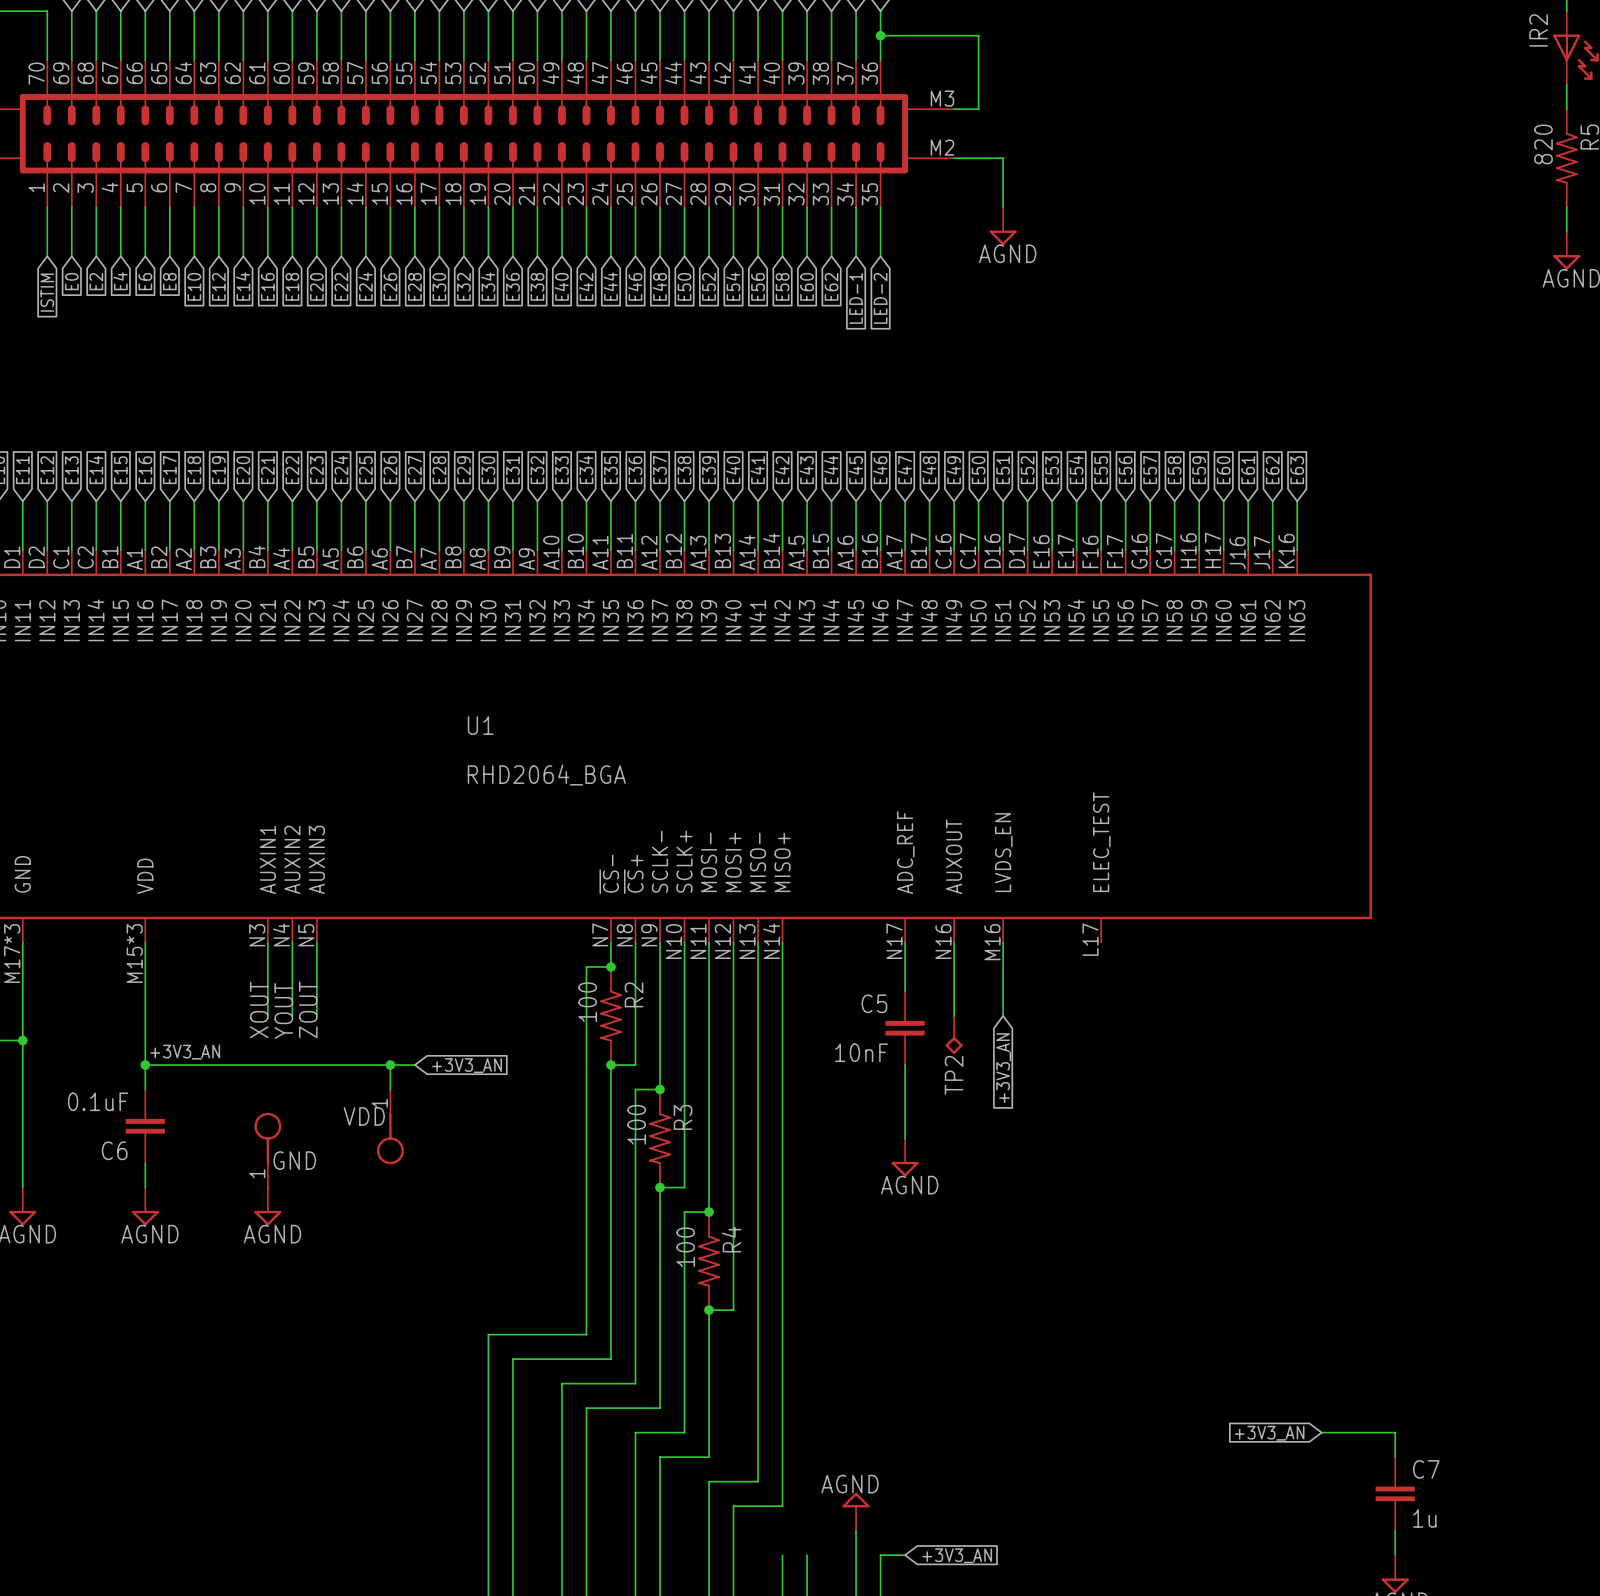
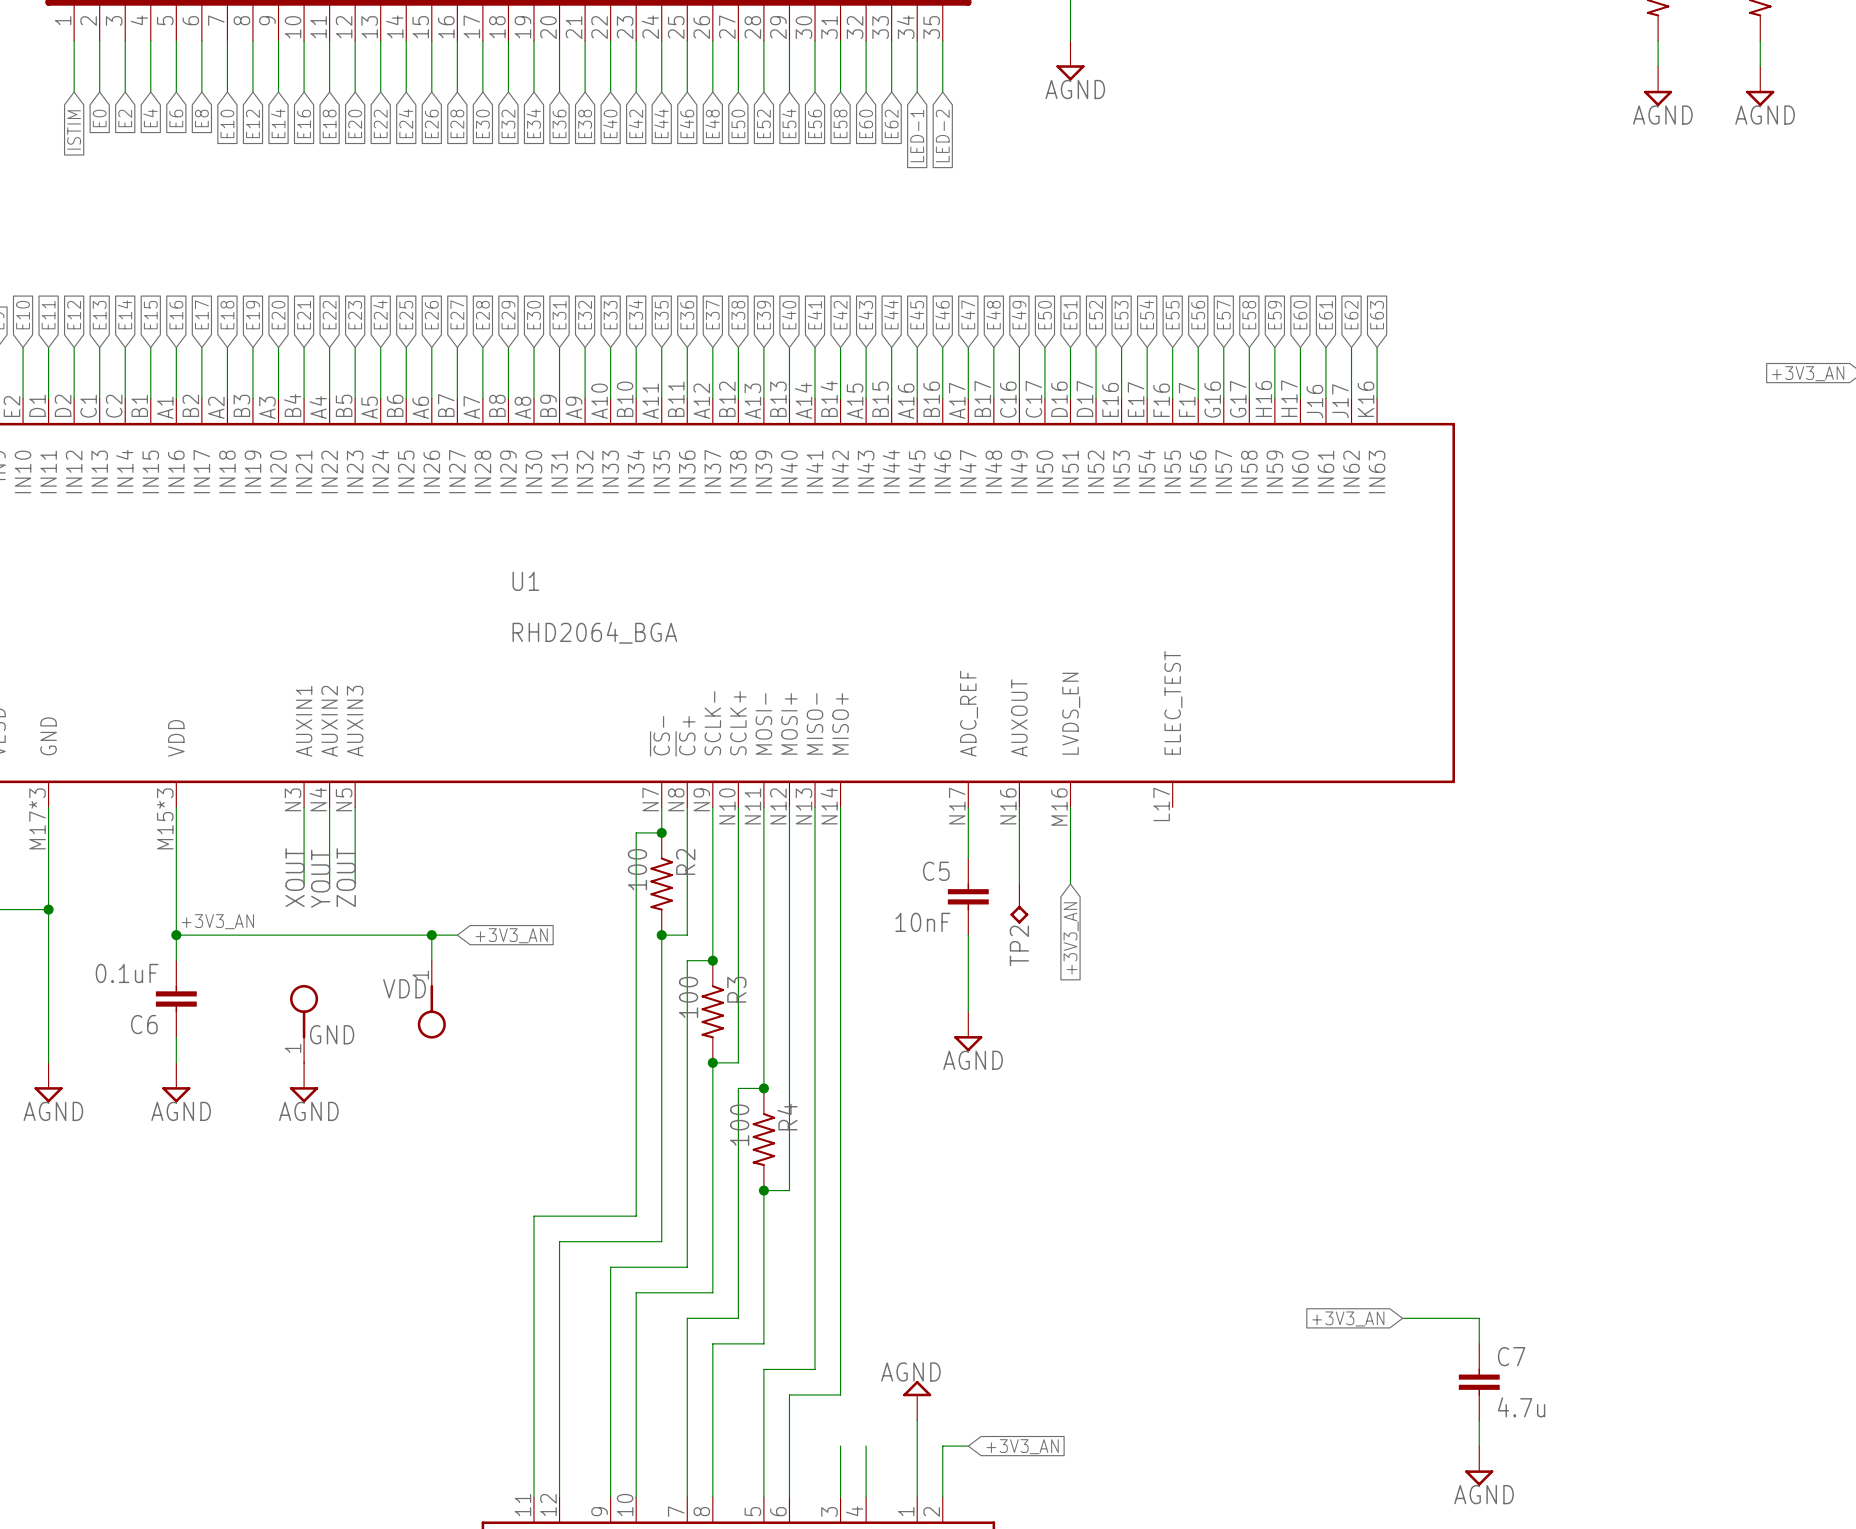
C7 value: 1u (1424, 1518) -> 4.7u (1521, 1407)

